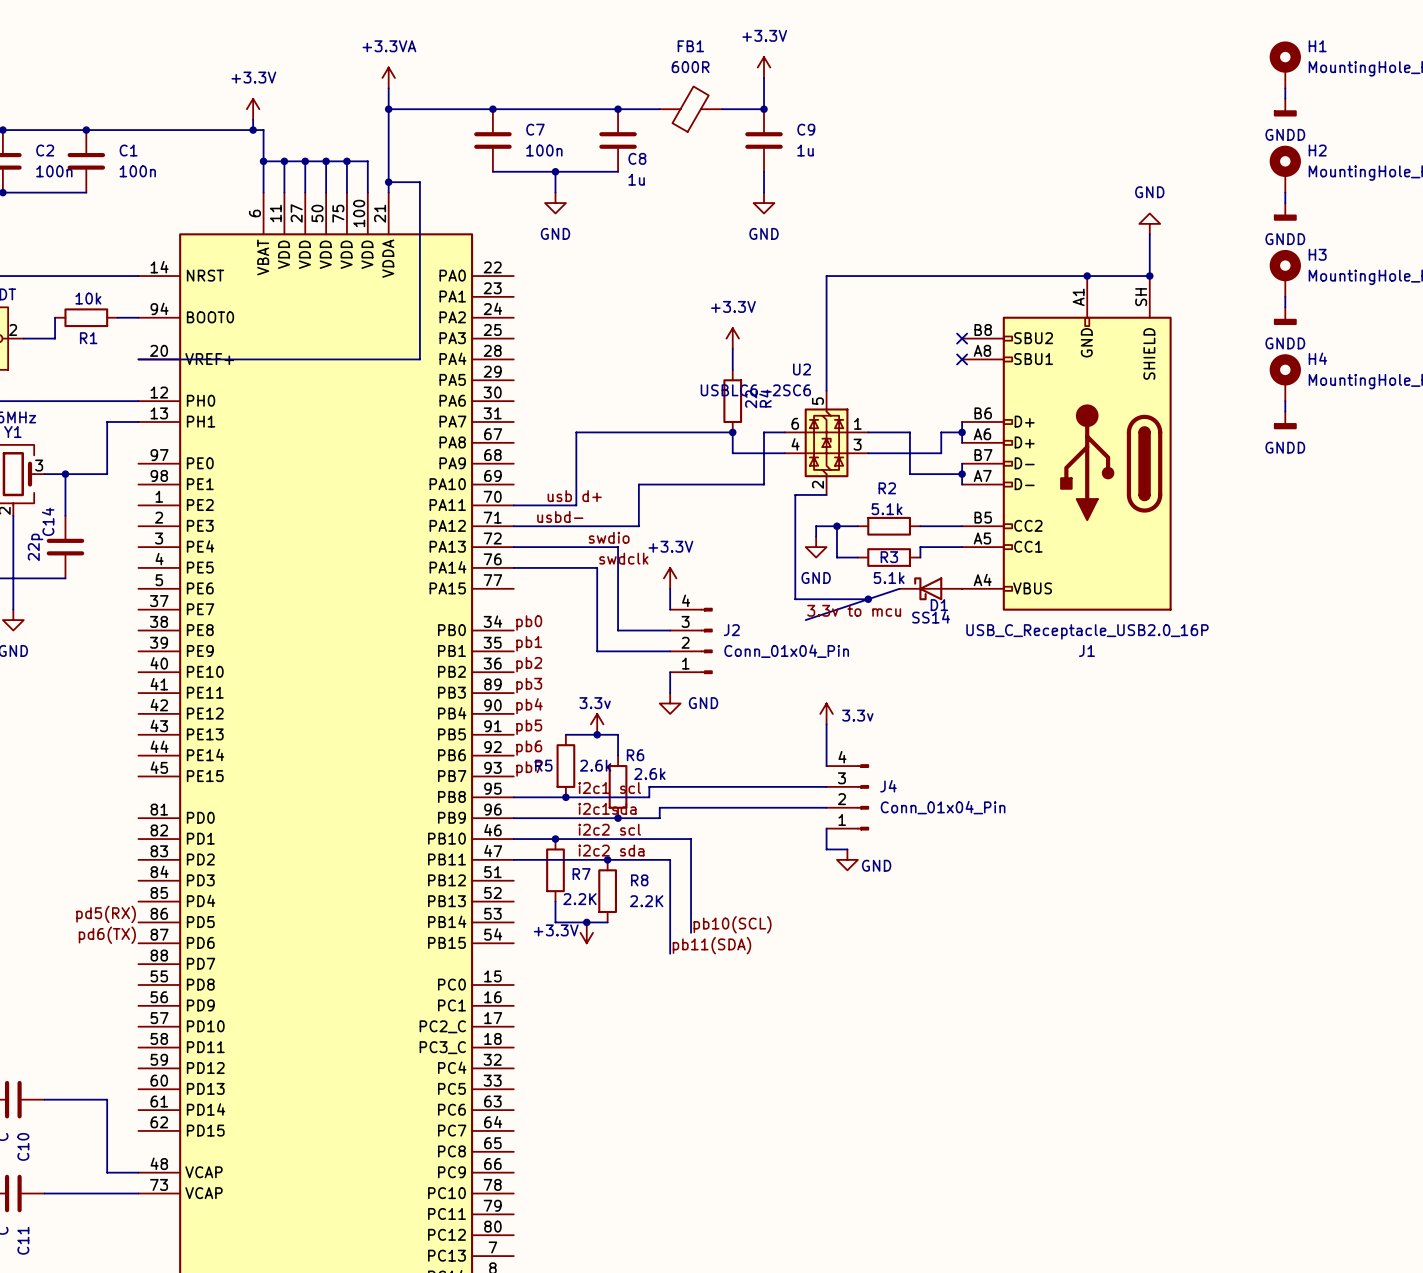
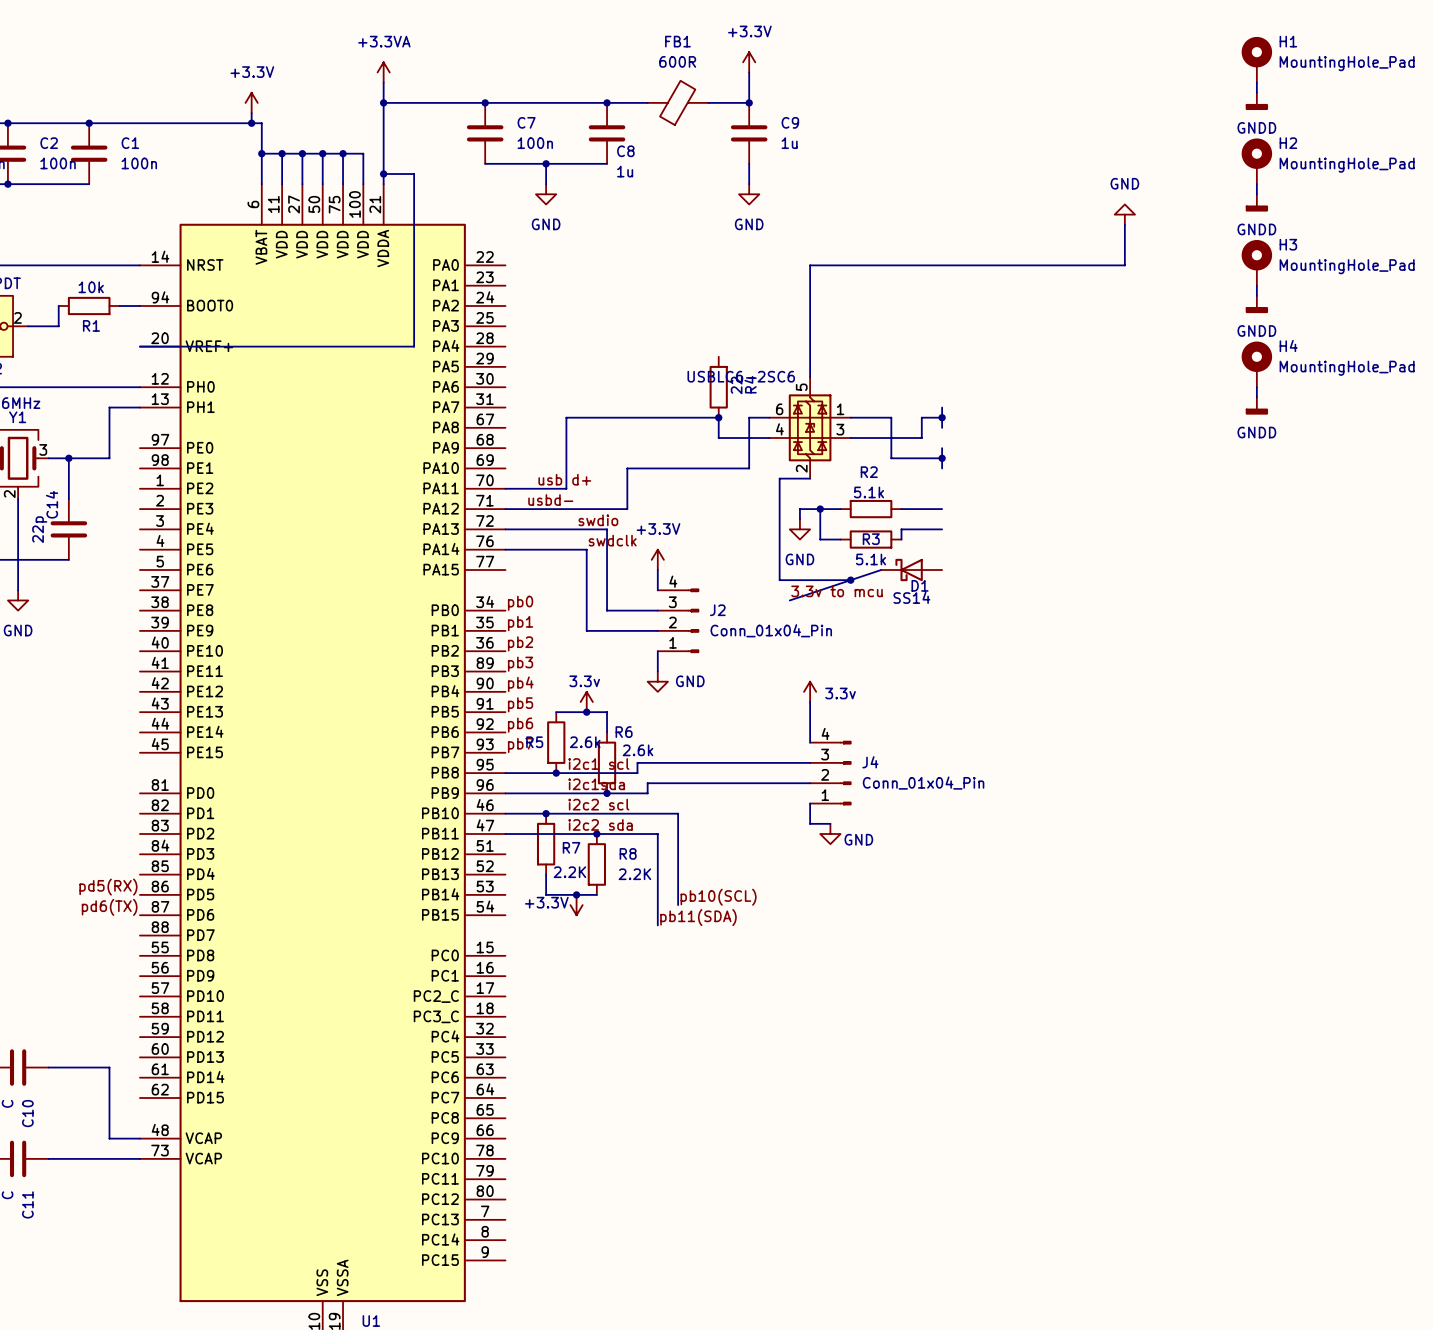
junction: (1087, 276) -> none
junction: (1149, 276) -> none
power symbol: +3.3V (732, 338) -> none
no-connect mark: (962, 338) -> none
wire: (732, 349) (732, 369) -> none
no-connect mark: (962, 359) -> none
U2 name: U2 (802, 369) -> none
J1: USB_C_Receptacle_USB2.0_16P (1066, 443) -> none

